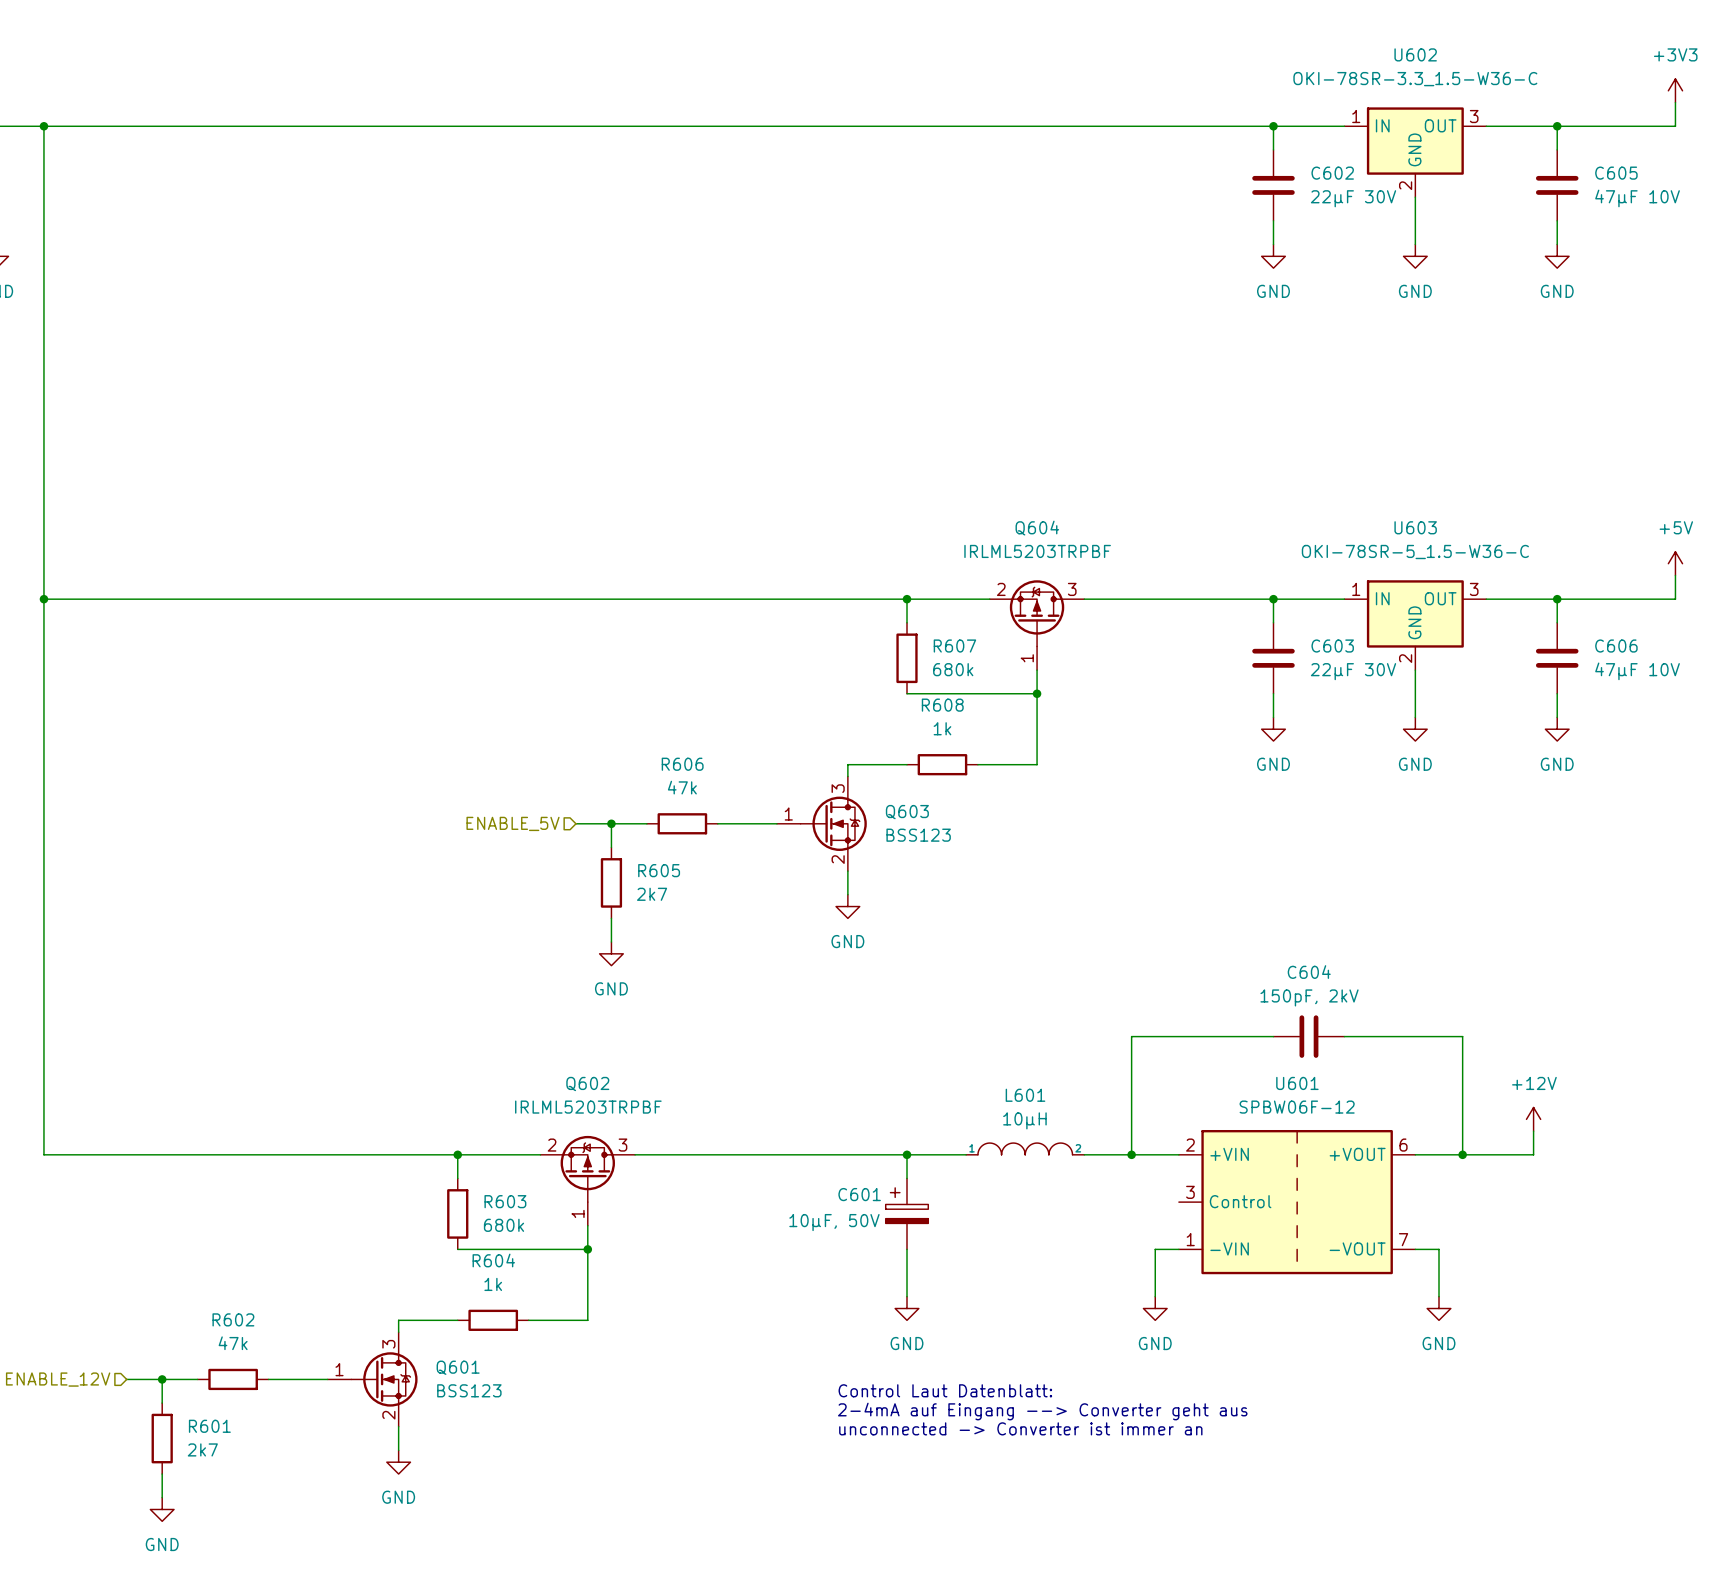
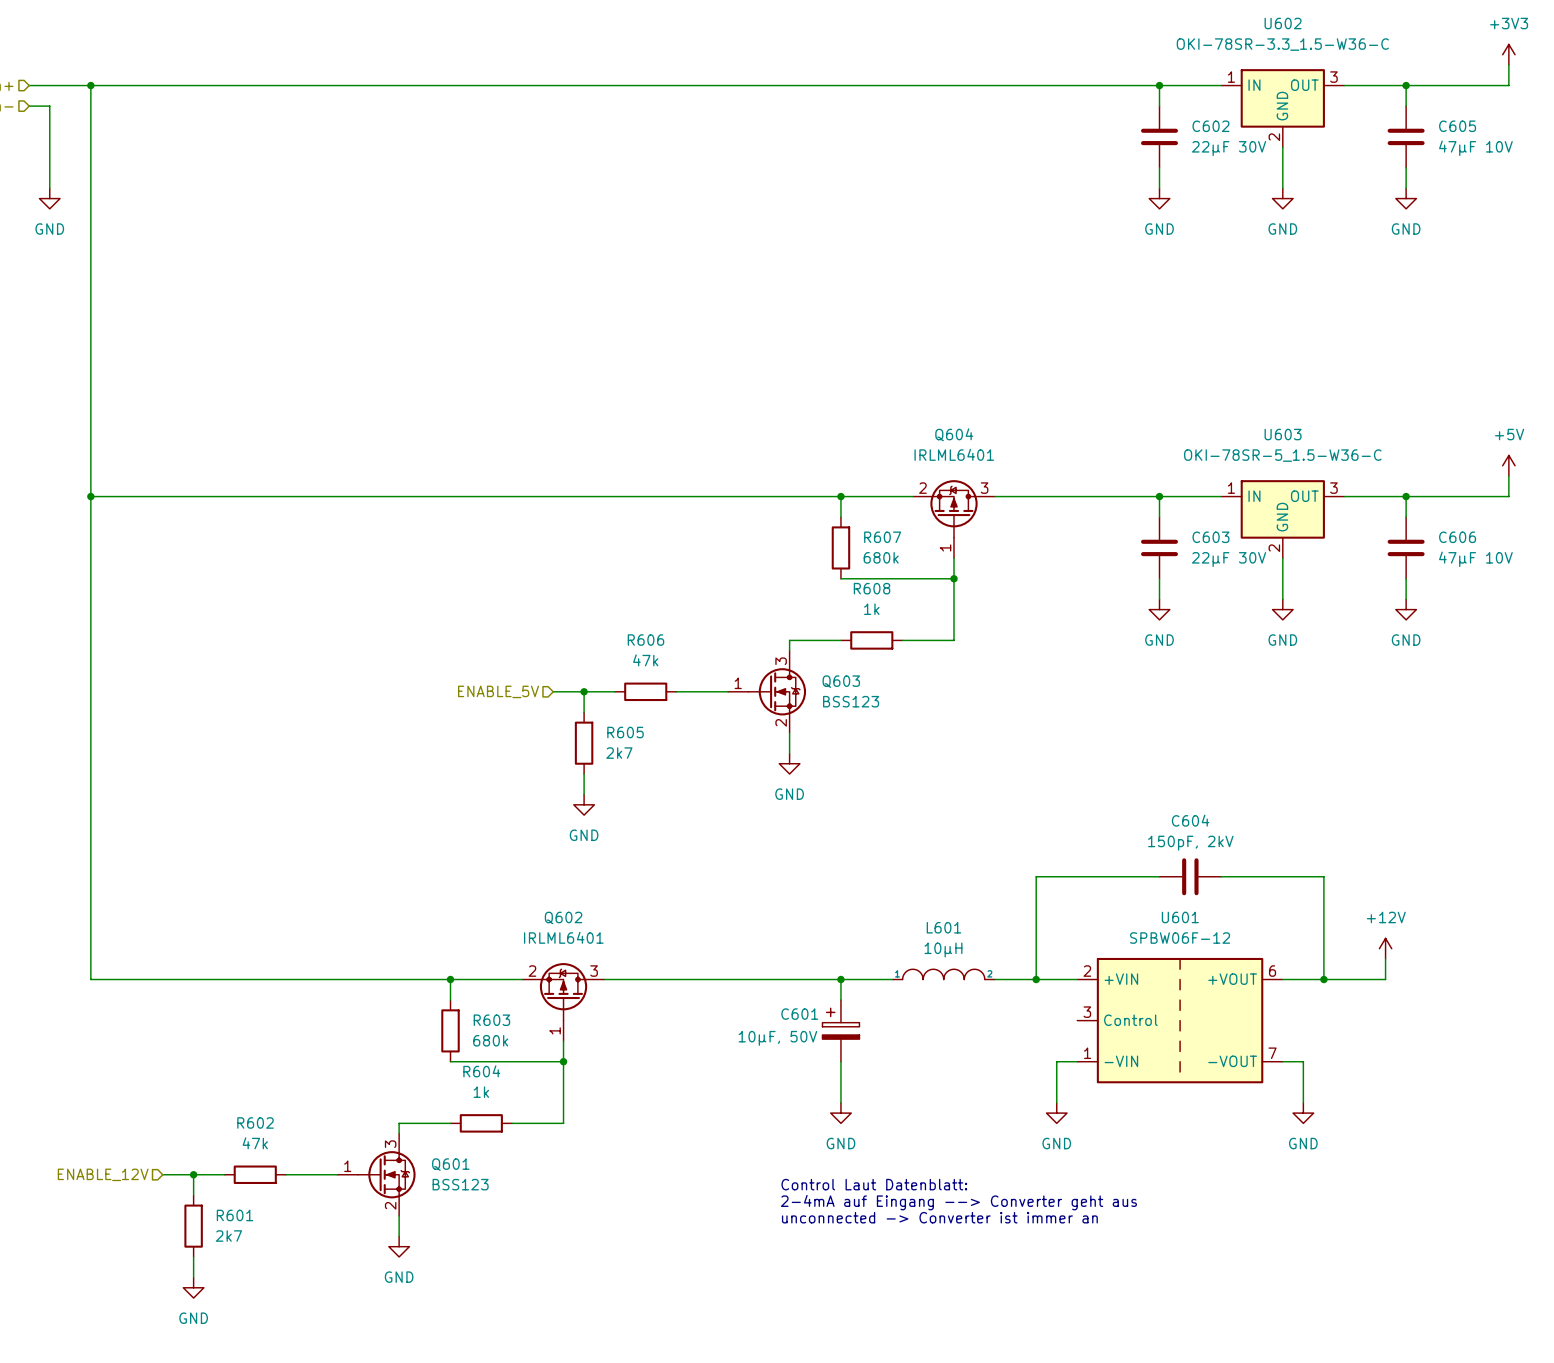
Q604 value: IRLML5203TRPBF (1037, 551) -> IRLML6401 (954, 454)
Q602 value: IRLML5203TRPBF (588, 1107) -> IRLML6401 (563, 937)

